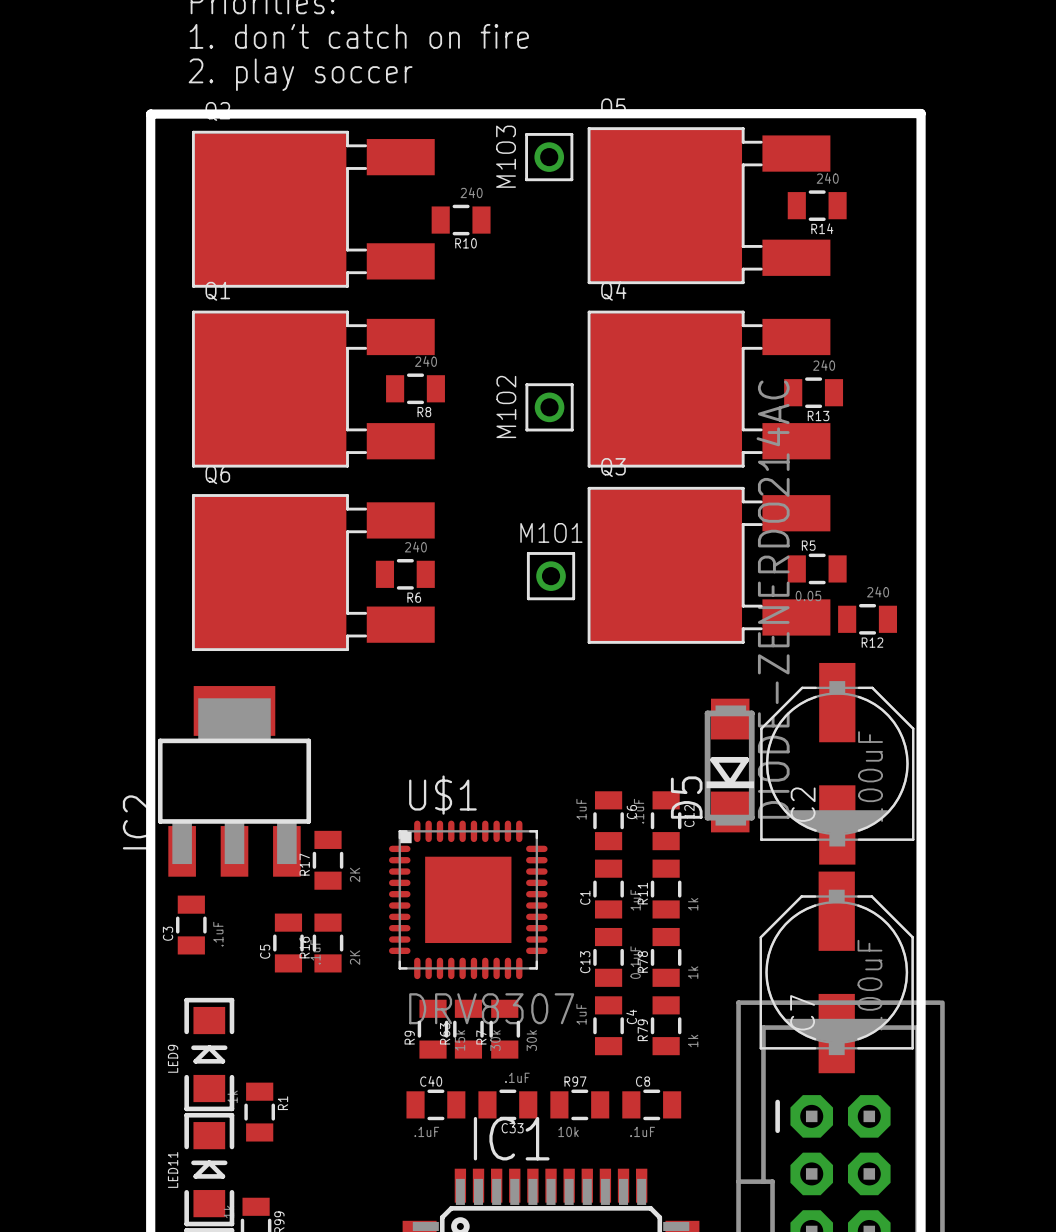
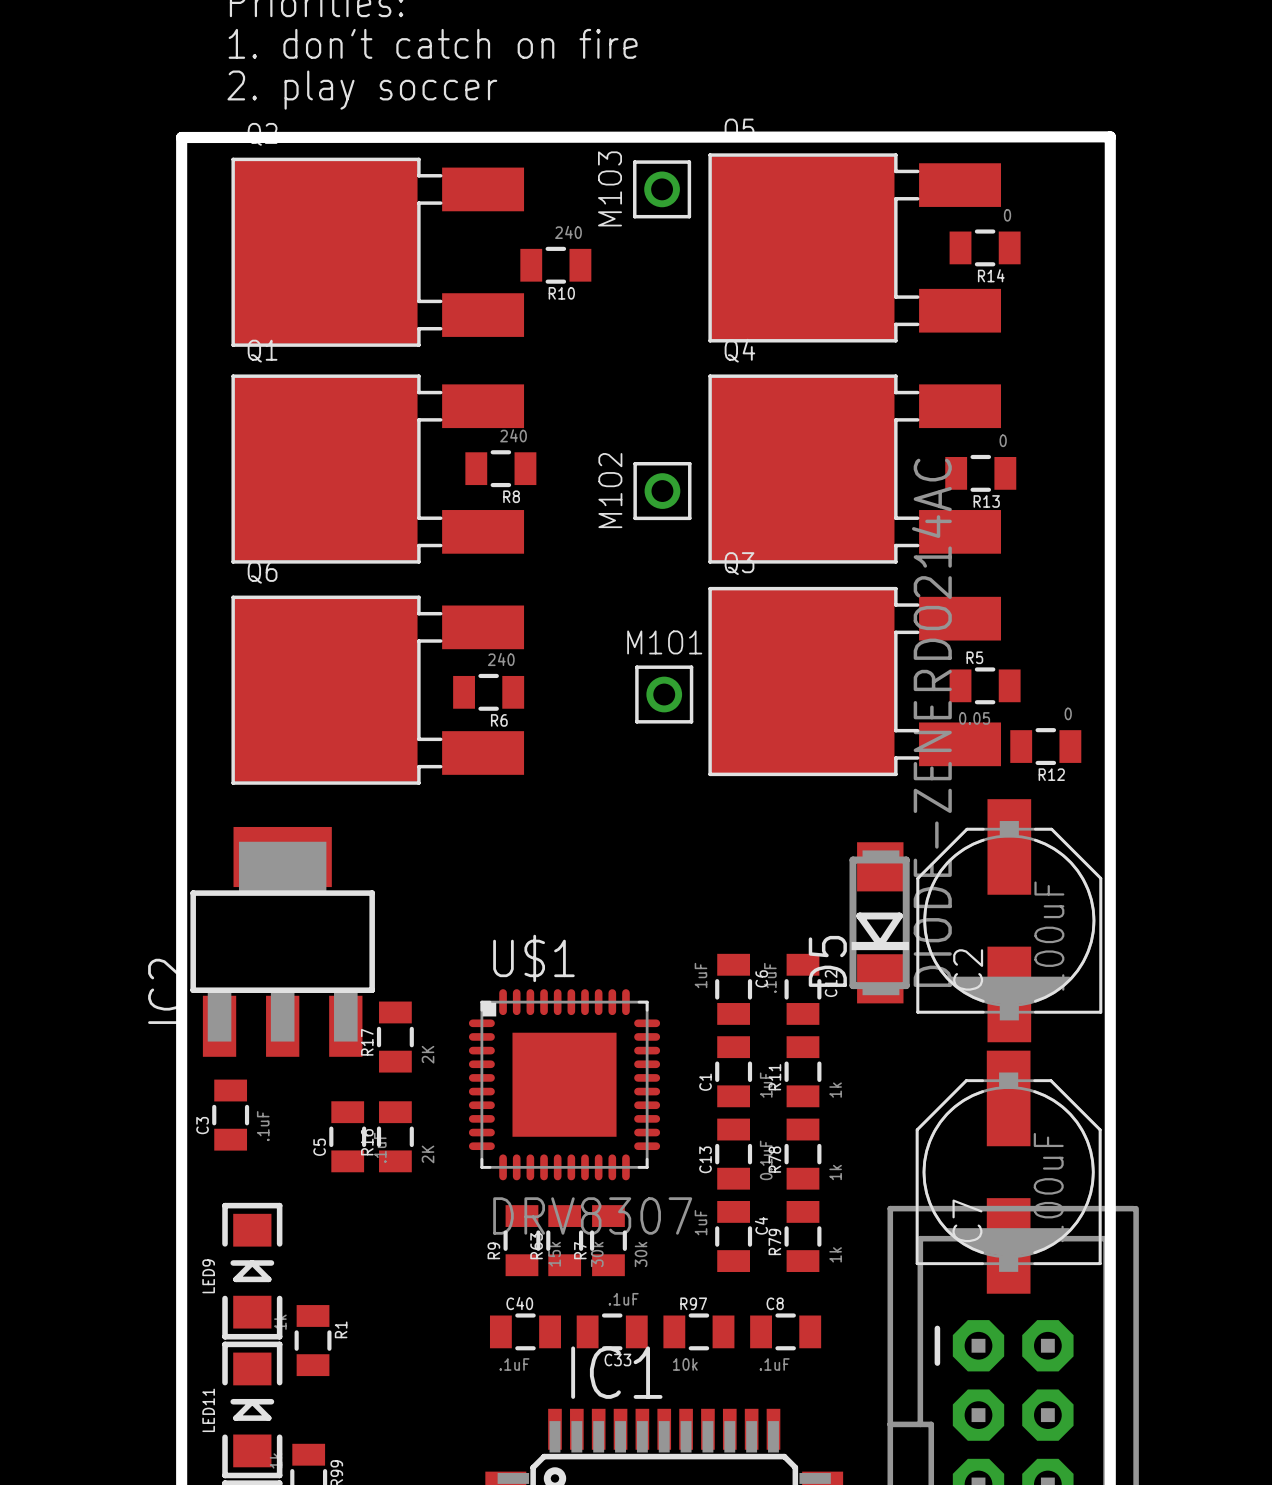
R14 value: 240 (827, 178) -> 0 (1007, 215)
R13 value: 240 (824, 365) -> 0 (1003, 440)
R12 value: 240 (878, 592) -> 0 (1068, 713)

